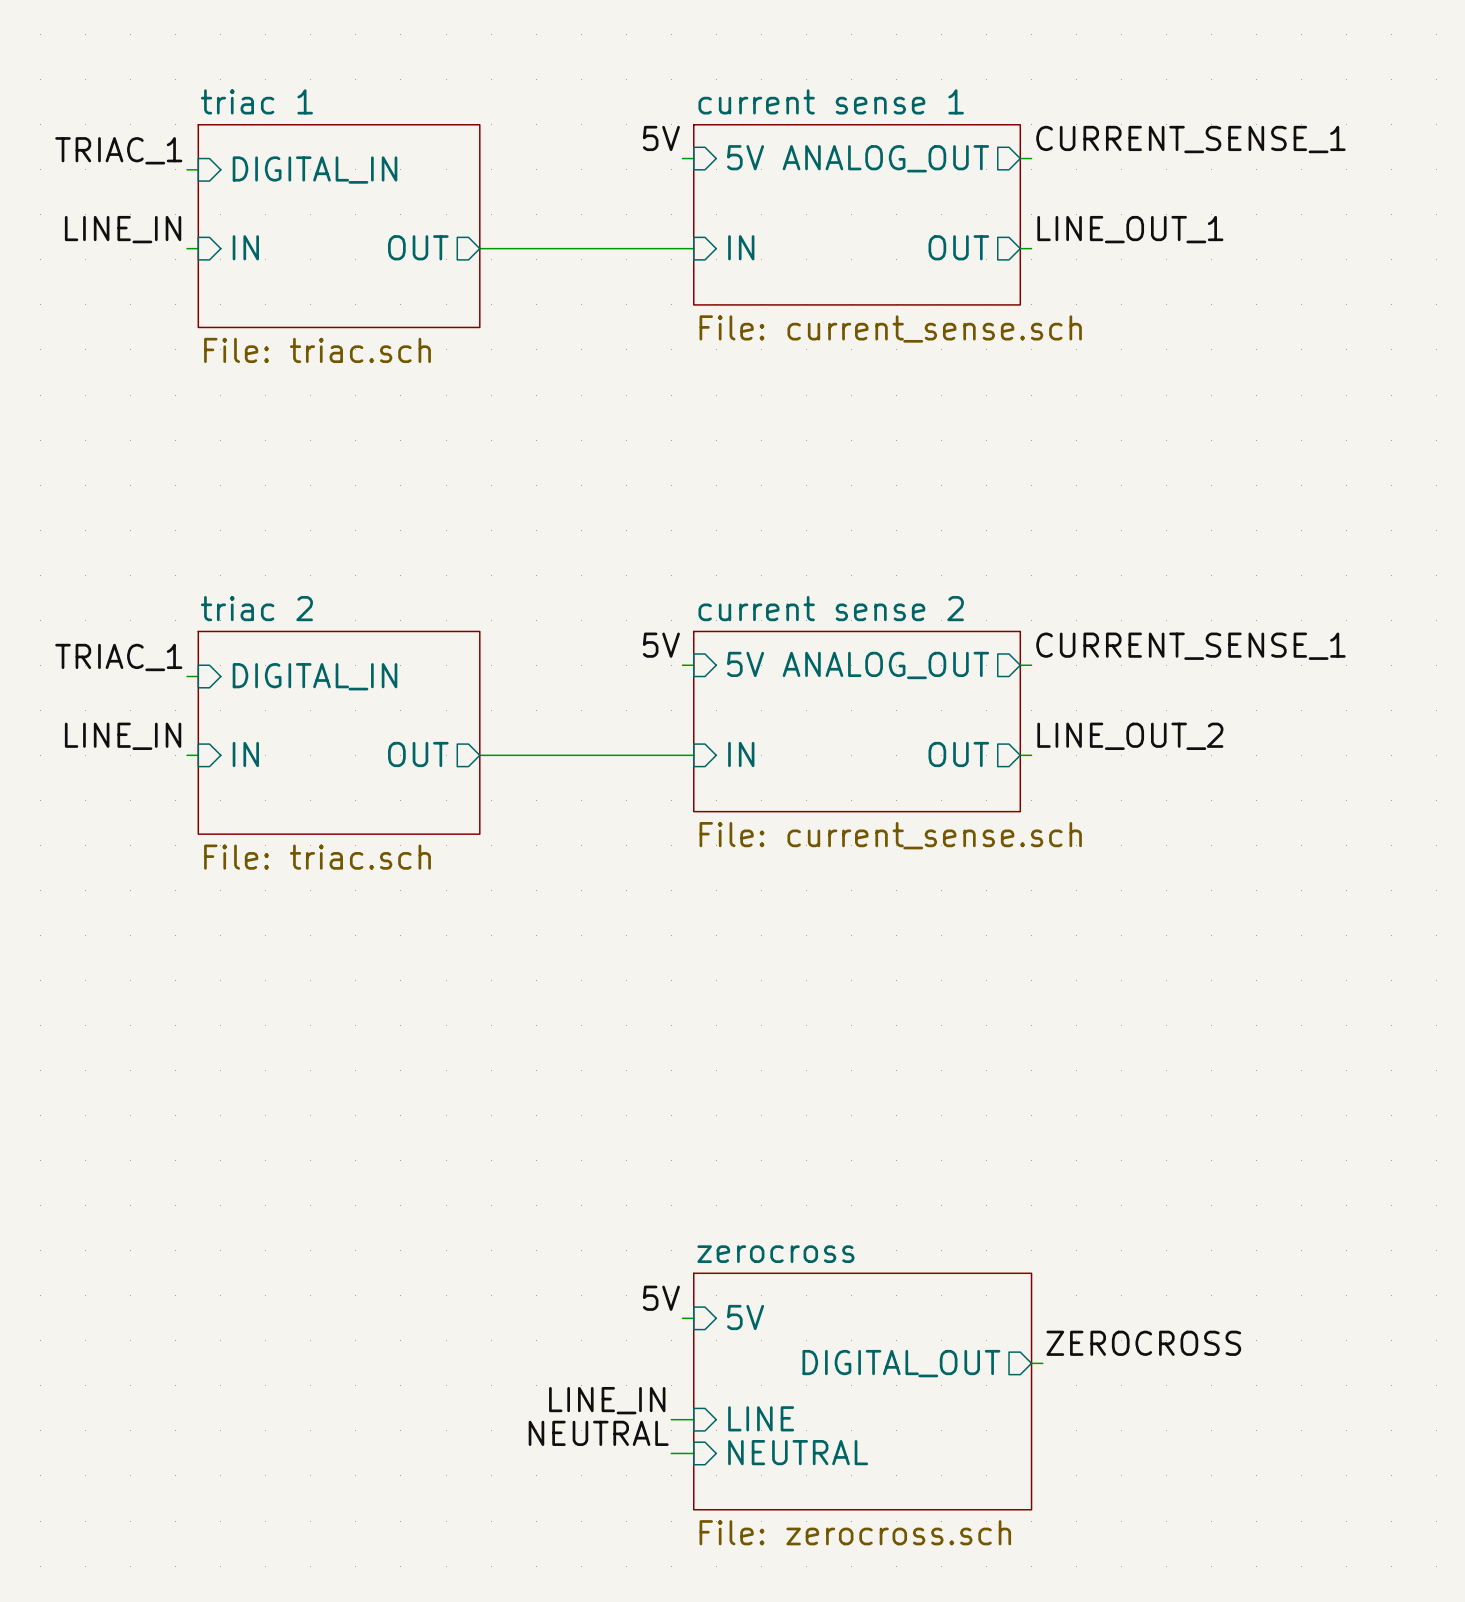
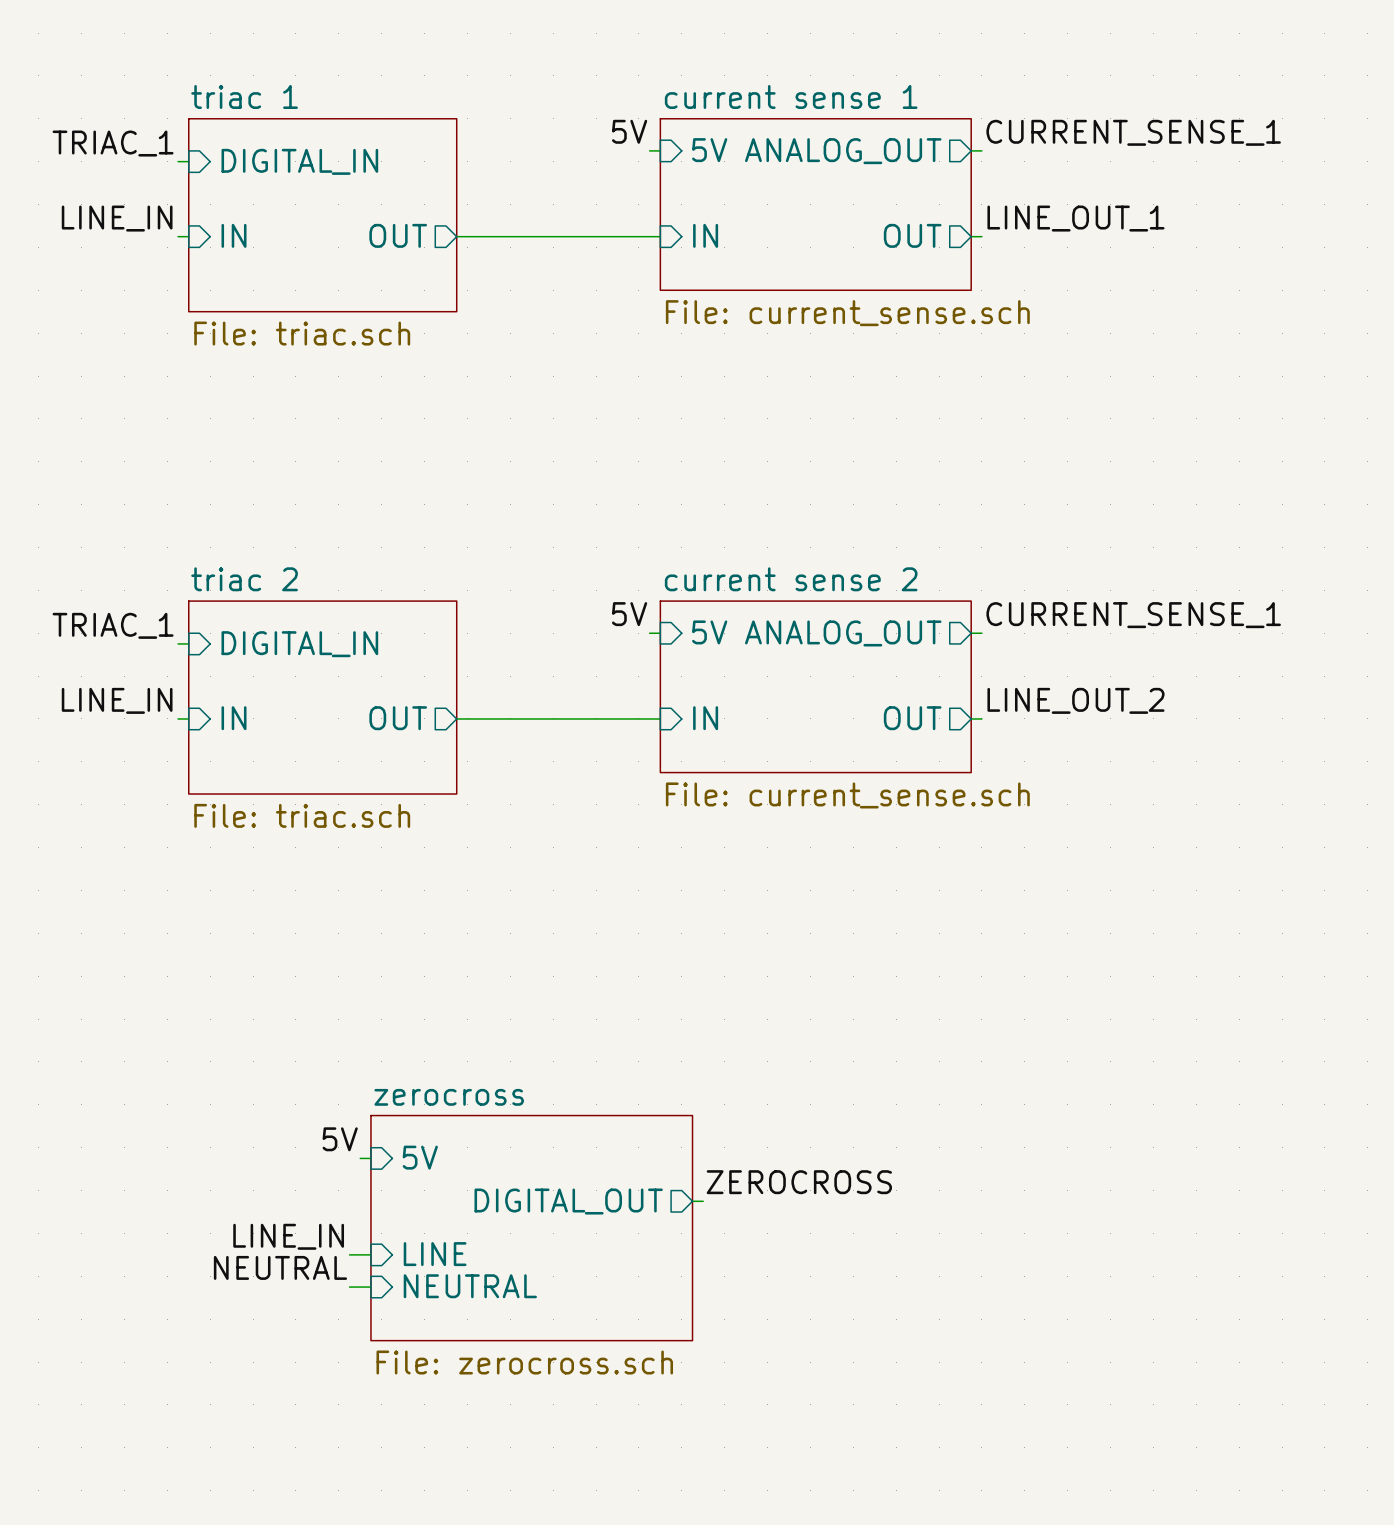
label position: 5V (661, 1298) -> 5V (340, 1139)
sheet pin position: 5V (745, 1317) -> 5V (420, 1157)
wire: (682, 1318) (693, 1318) -> (360, 1158) (370, 1158)
label position: ZEROCROSS (1143, 1343) -> ZEROCROSS (799, 1182)
sheet pin position: DIGITAL_OUT (901, 1363) -> DIGITAL_OUT (568, 1201)
wire: (1031, 1363) (1042, 1363) -> (692, 1201) (703, 1201)
sheet zerocross position: (862, 1391) -> (531, 1228)
label position: LINE_IN (607, 1400) -> LINE_IN (288, 1236)
sheet pin position: LINE (761, 1418) -> LINE (435, 1254)
wire: (671, 1419) (693, 1419) -> (349, 1254) (370, 1254)
label position: NEUTRAL (598, 1433) -> NEUTRAL (280, 1267)
sheet pin position: NEUTRAL (798, 1452) -> NEUTRAL (470, 1286)
wire: (671, 1453) (693, 1453) -> (349, 1287) (370, 1287)

